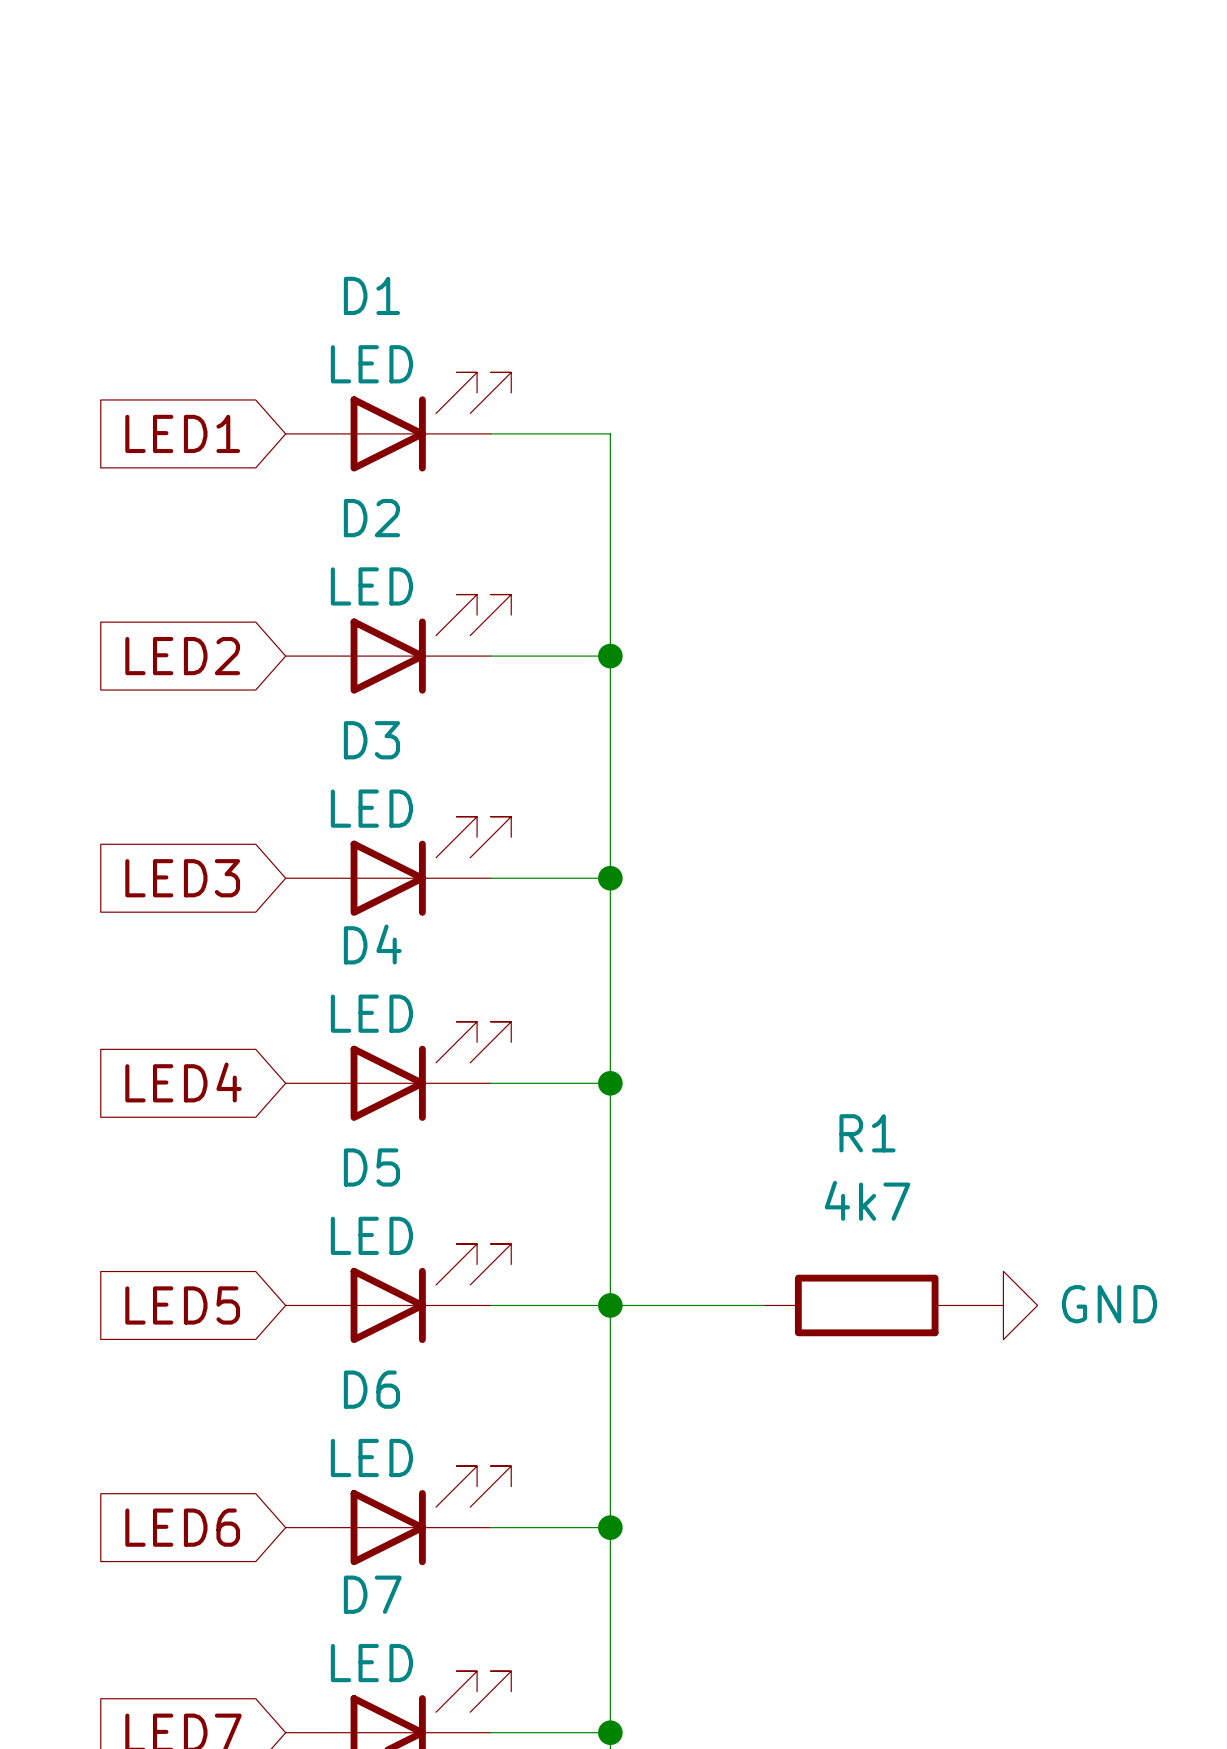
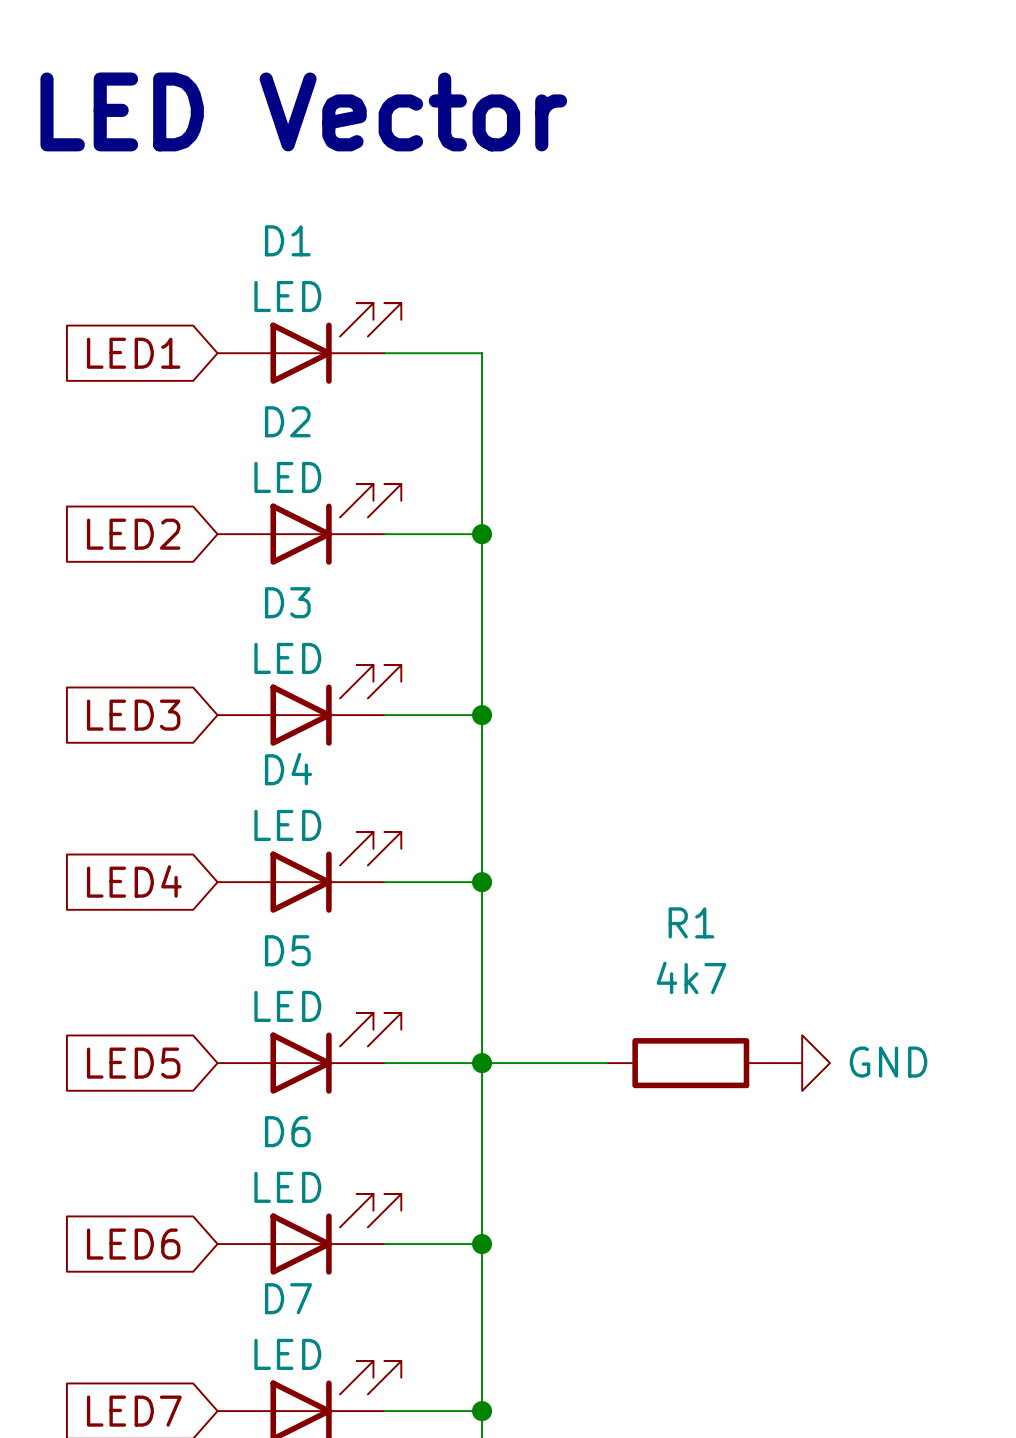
text: none -> LED Vector (303, 111)

